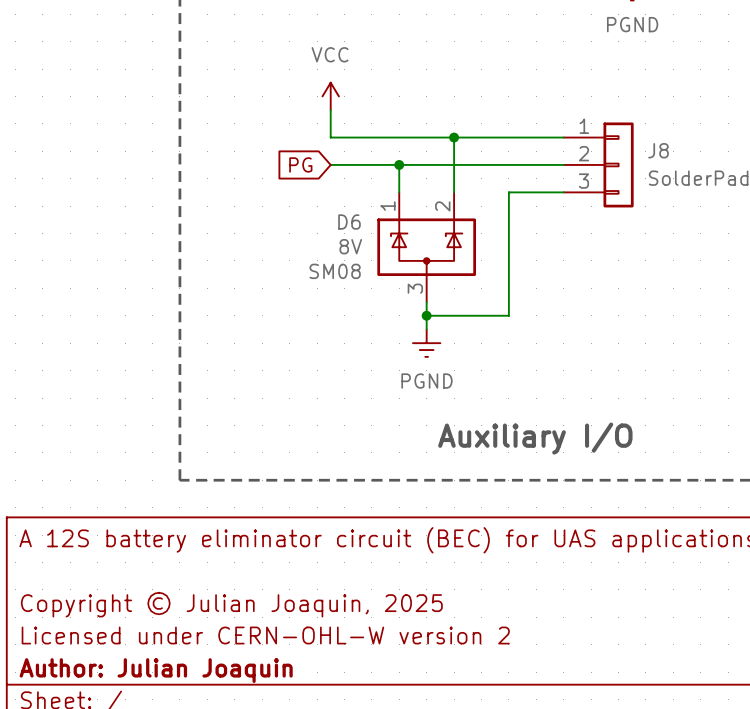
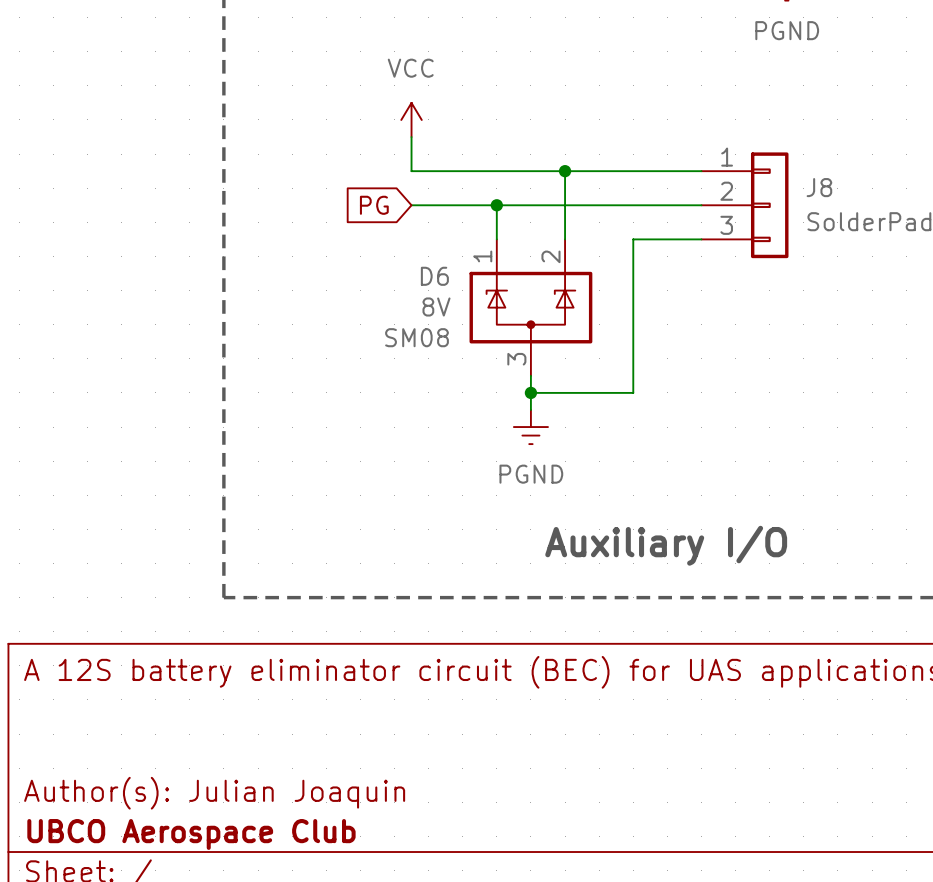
title block: Copyright © Julian Joaquin, 2025 (231, 604) -> none
title block: Licensed under CERN-OHL-W version 2 (265, 635) -> Author(s): Julian Joaquin (214, 793)
title block: Author: Julian Joaquin (156, 670) -> UBCO Aerospace Club (191, 834)

